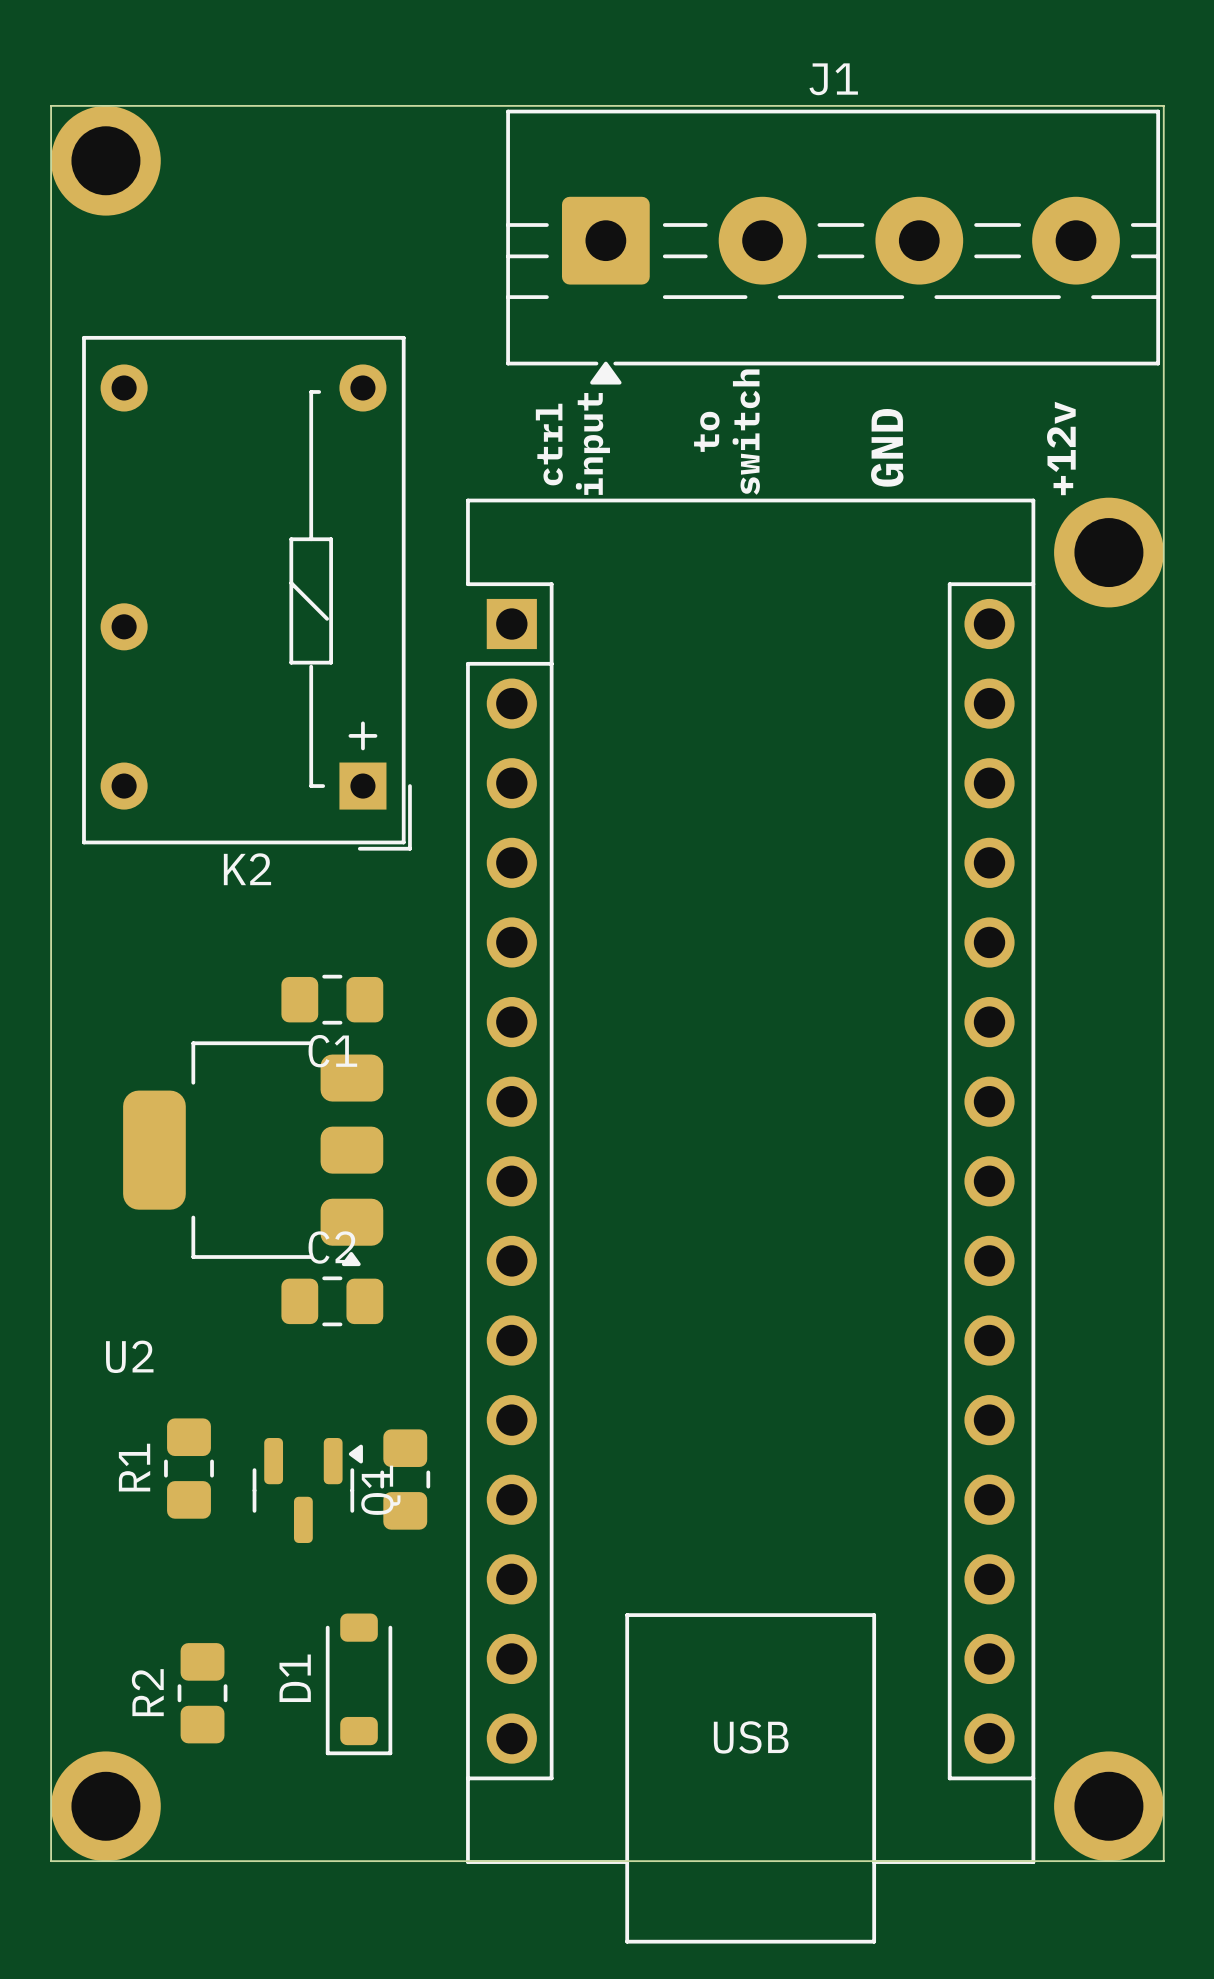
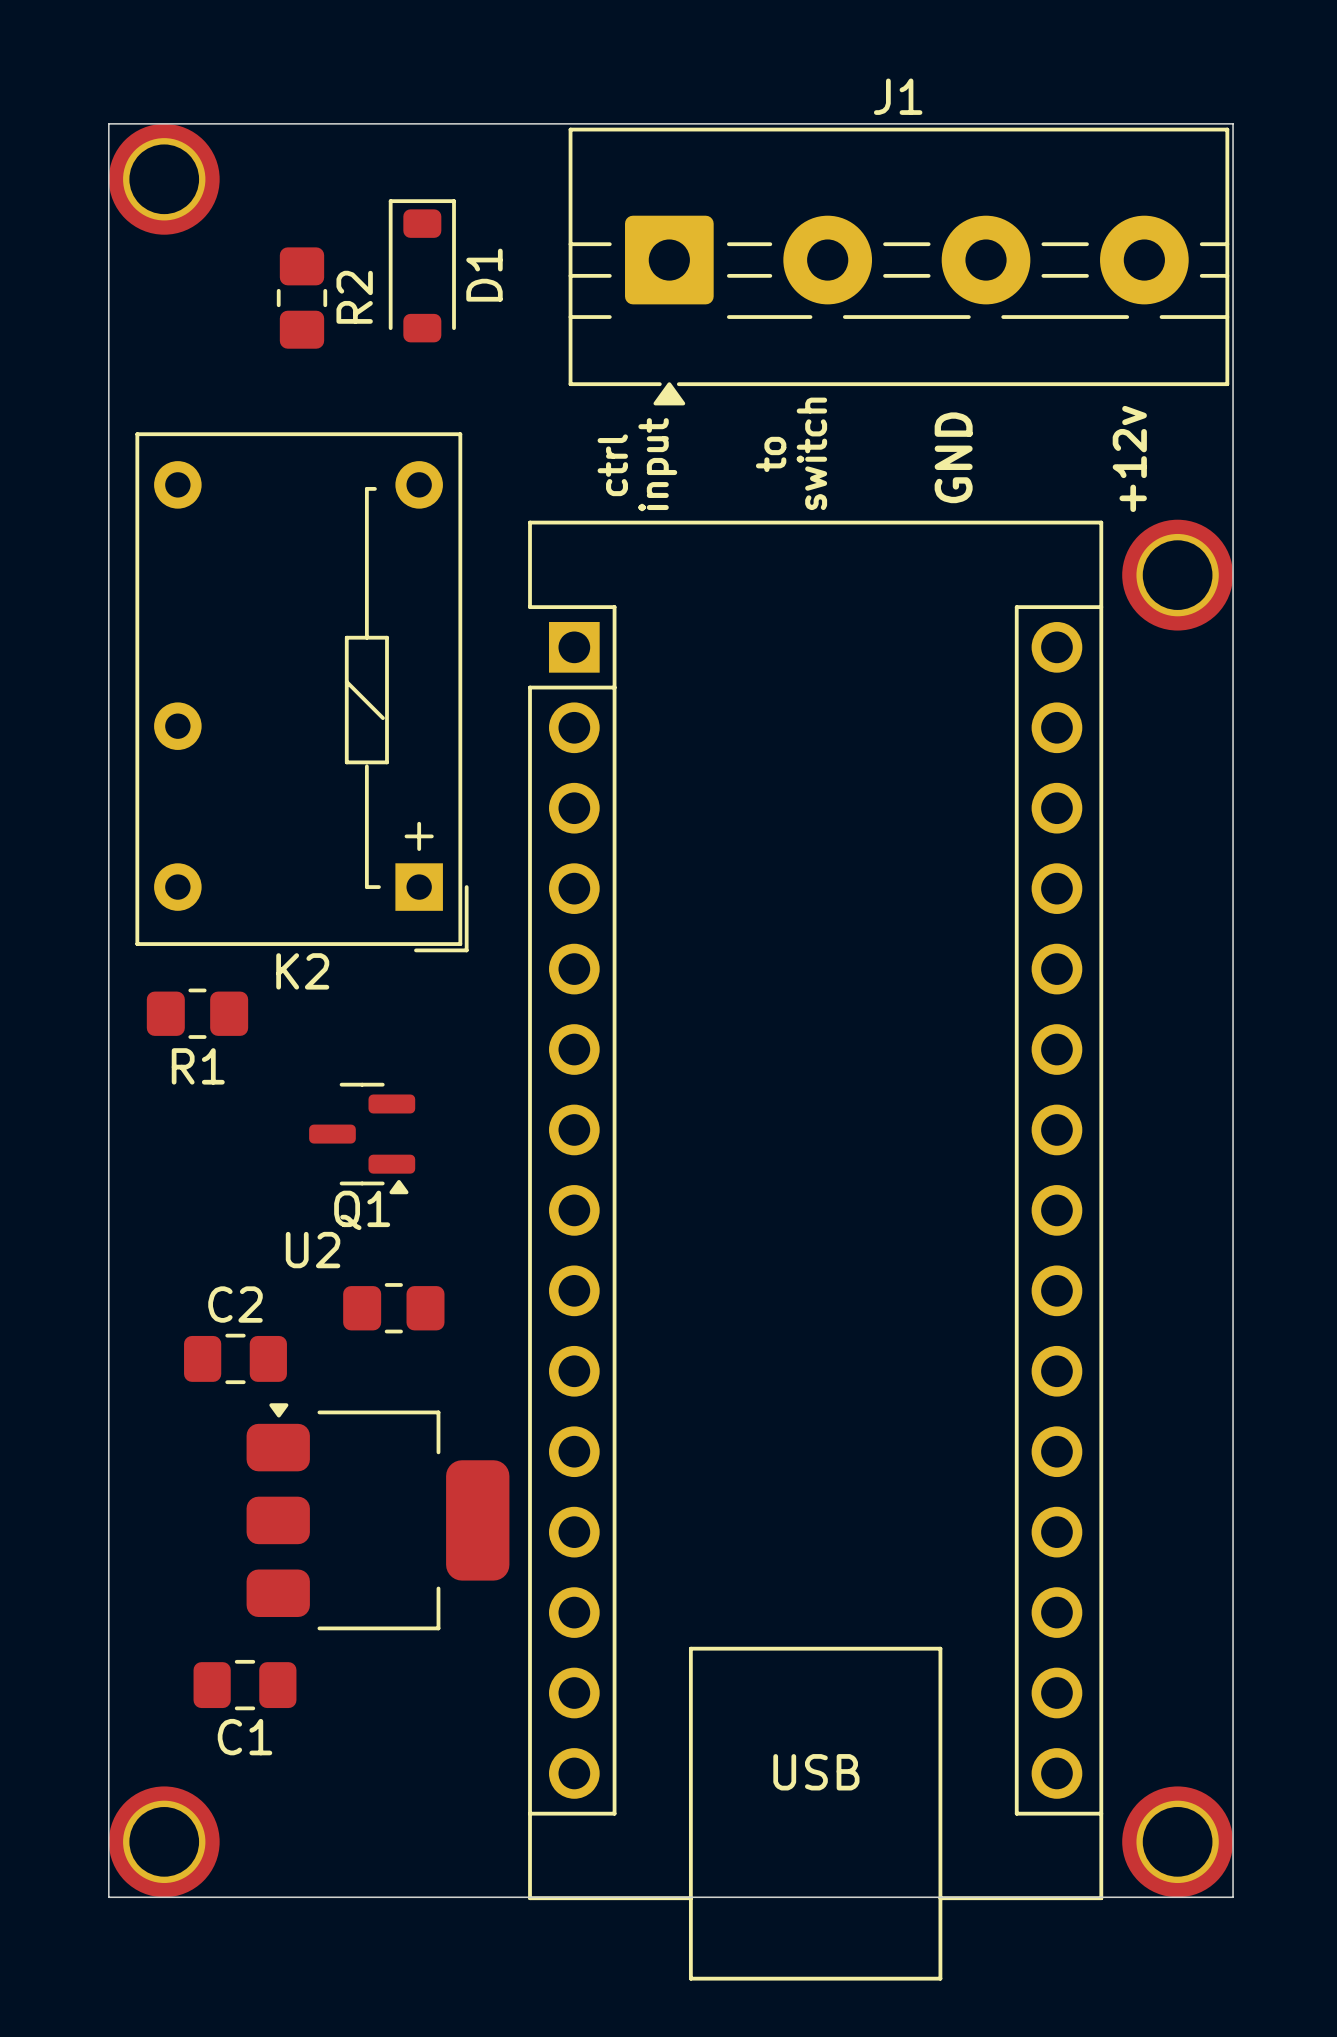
K2 position: (246, 593) -> (301, 692)
C1 position: (332, 999) -> (244, 1685)
U2 rotation: 0° (253, 1153) -> 180° (378, 1516)
U2 position: (253, 1153) -> (378, 1516)
C2 position: (332, 1301) -> (235, 1358)
U2 name position: U2 (129, 1356) -> U2 (313, 1250)
R1 name position: R1 (134, 1467) -> R1 (198, 1066)
R1 rotation: 0° (188, 1468) -> 90° clockwise (197, 1013)
R1 position: (188, 1468) -> (197, 1013)
part rotation: 0° (405, 1479) -> 90° clockwise (393, 1308)
part position: (405, 1479) -> (393, 1308)
Q1 rotation: 0° (307, 1490) -> 90° clockwise (362, 1138)
Q1 position: (307, 1490) -> (362, 1138)
D1 rotation: 0° (359, 1684) -> 180° (422, 270)
D1 position: (359, 1684) -> (422, 270)
R2 name position: R2 (147, 1692) -> R2 (354, 297)
R2 position: (202, 1693) -> (301, 298)

